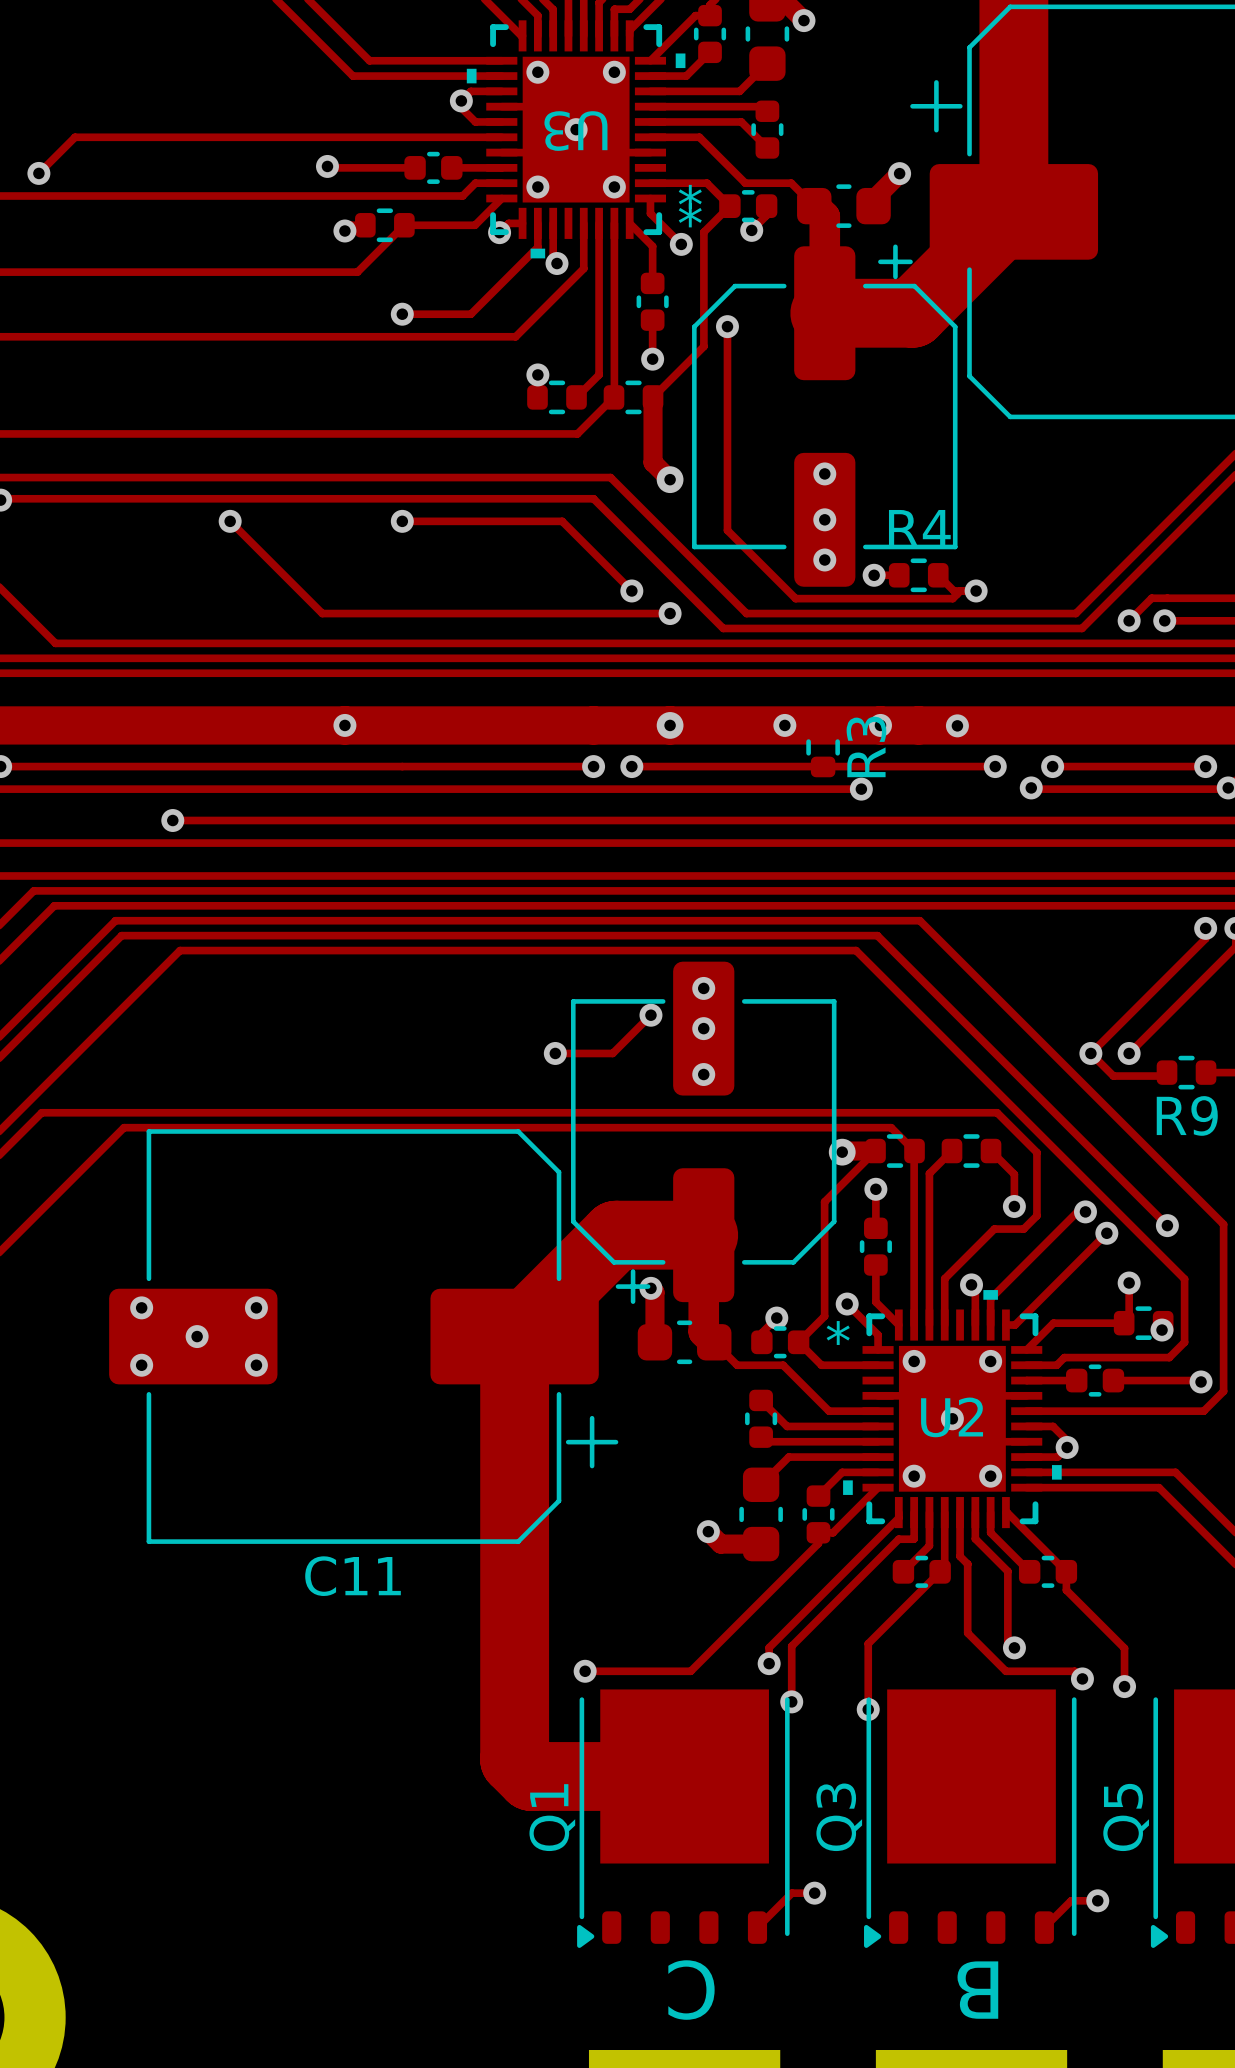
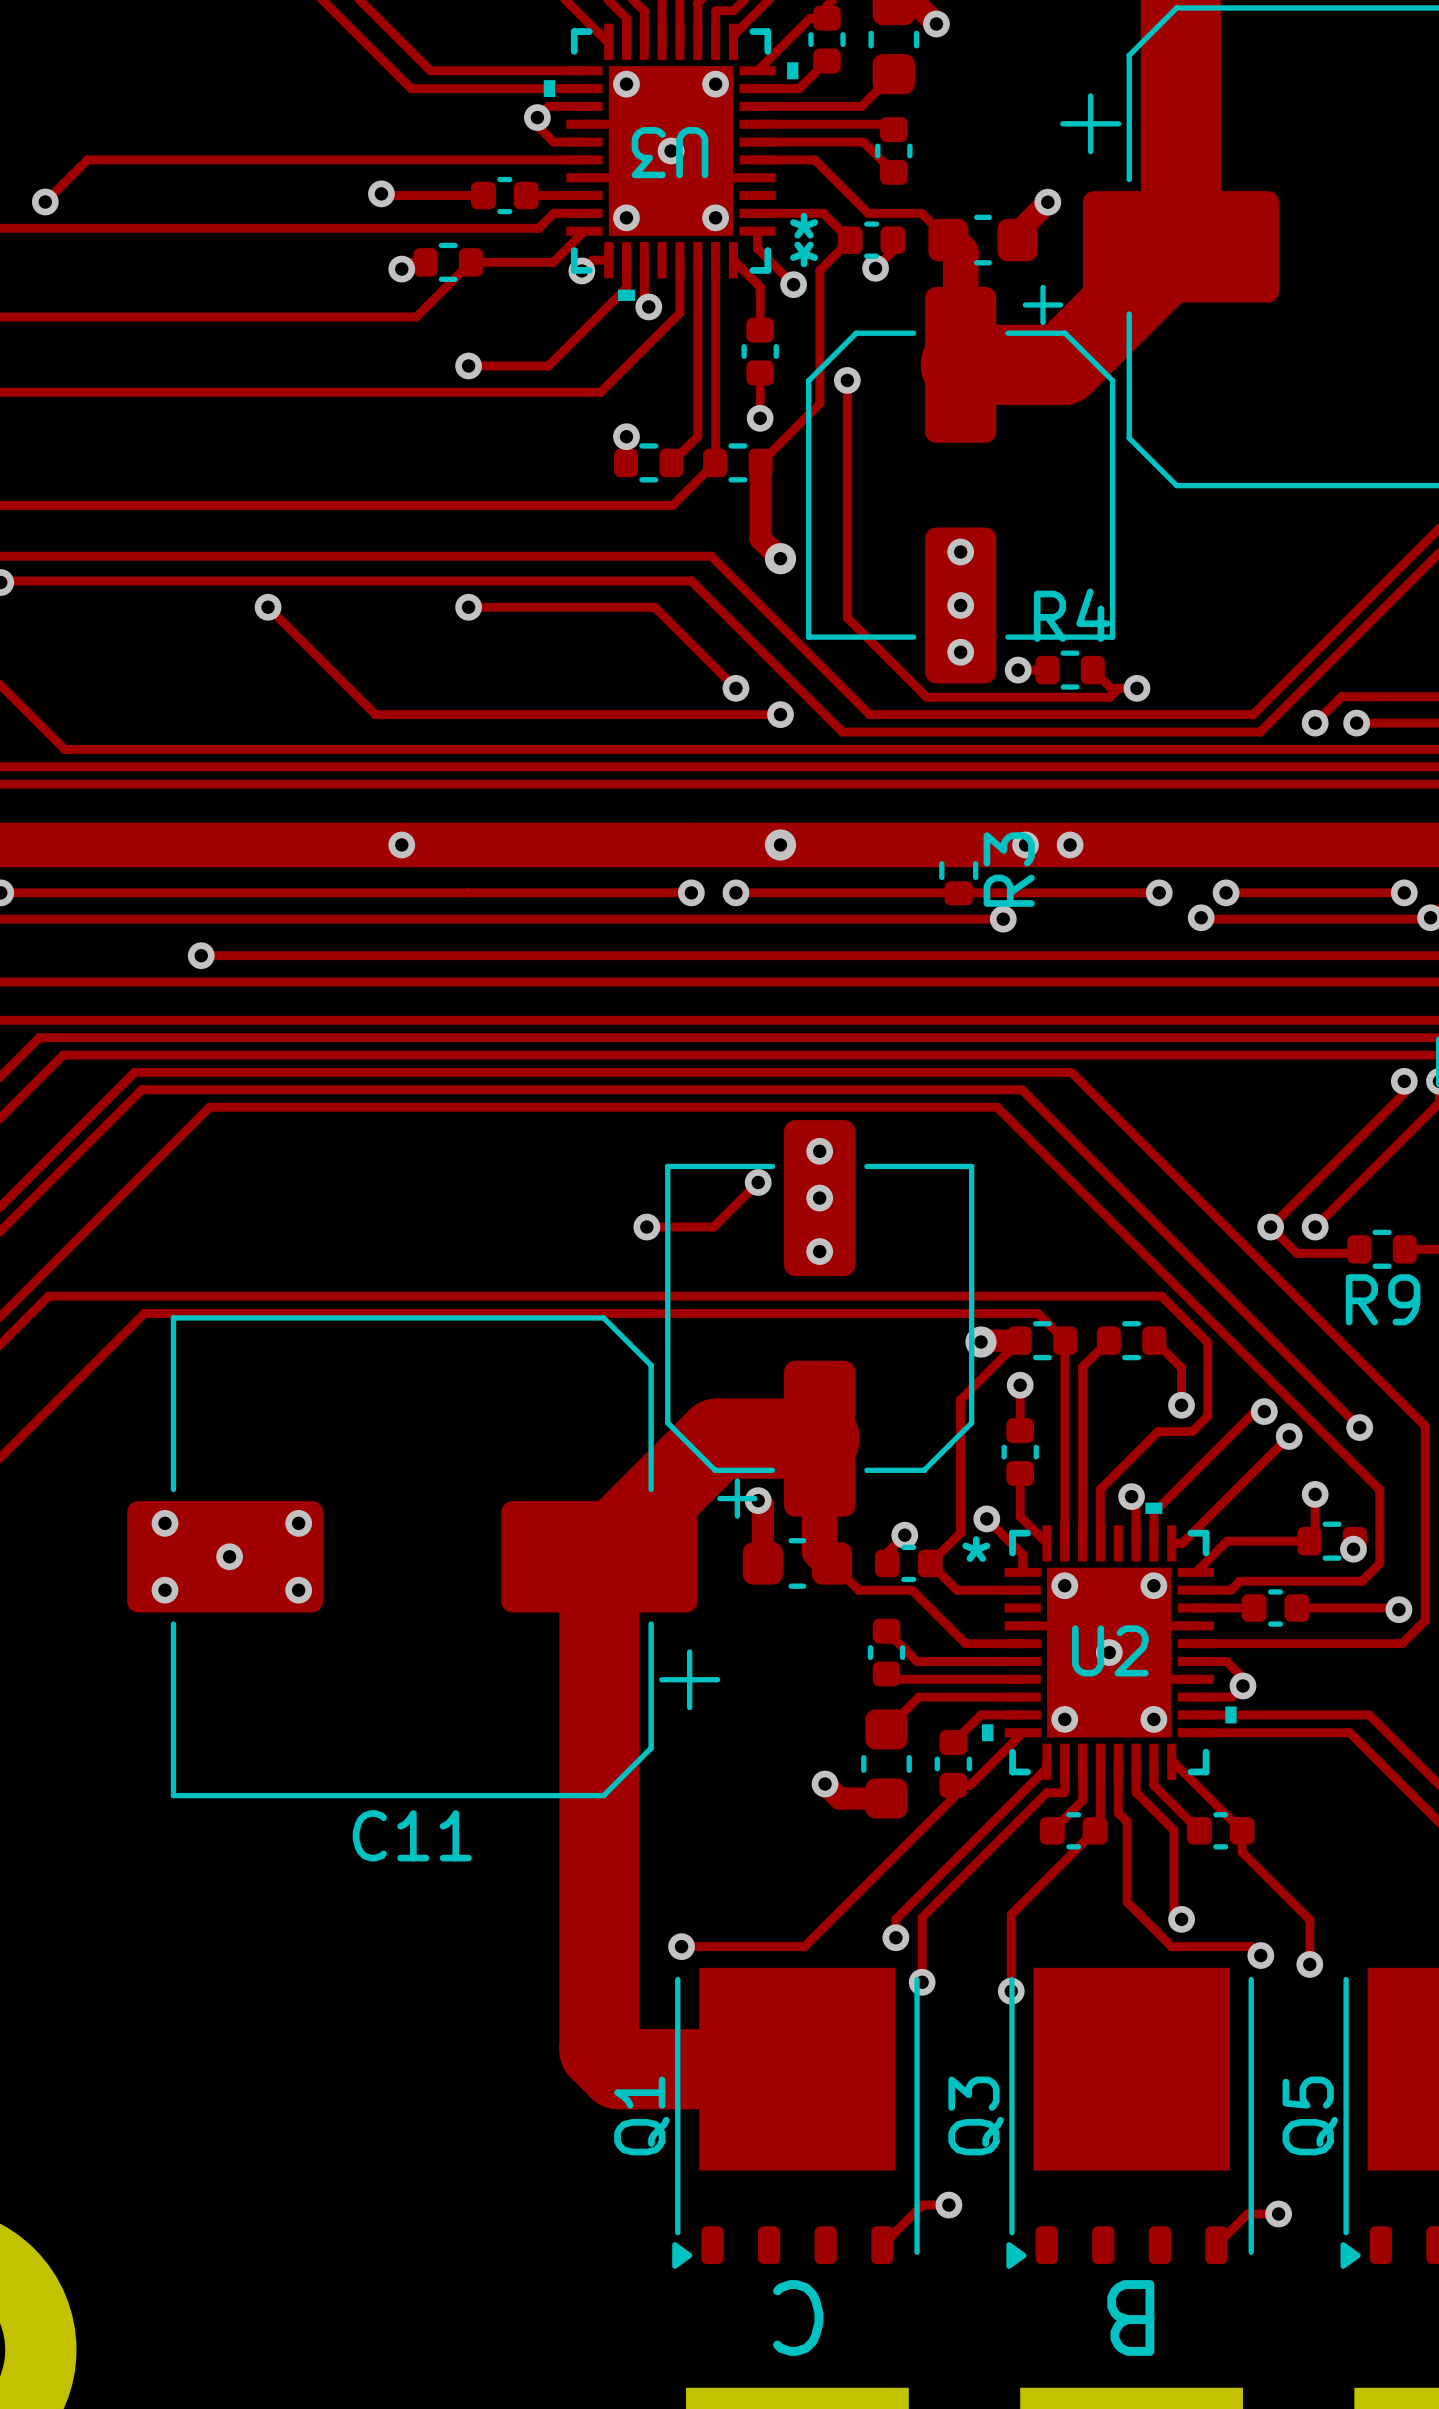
via: (784, 725) -> none
via position: (957, 725) -> (1070, 844)

